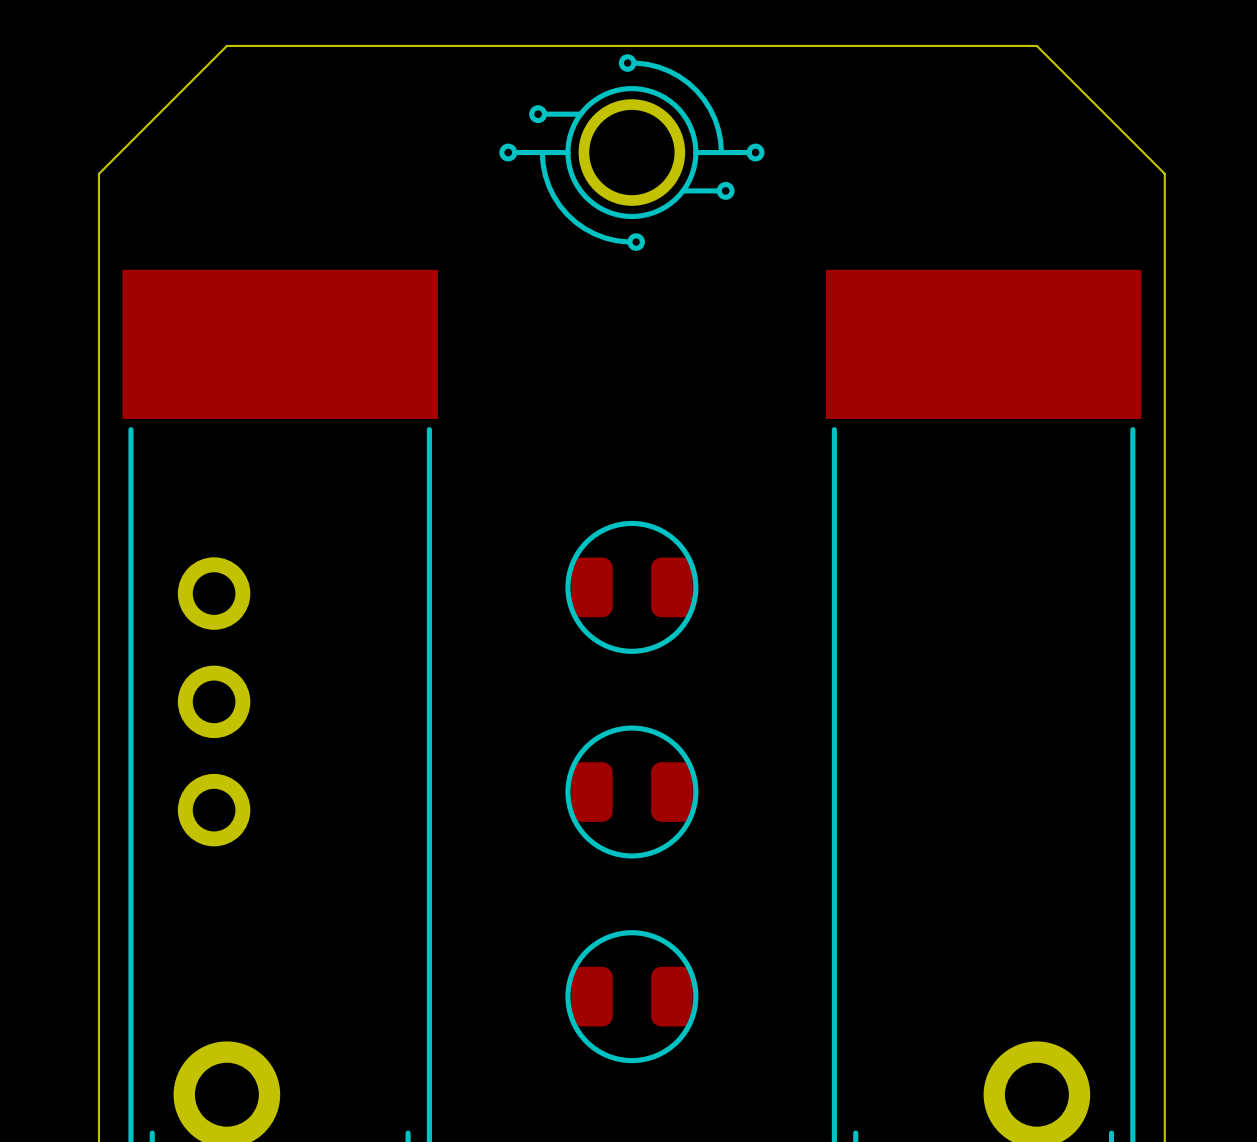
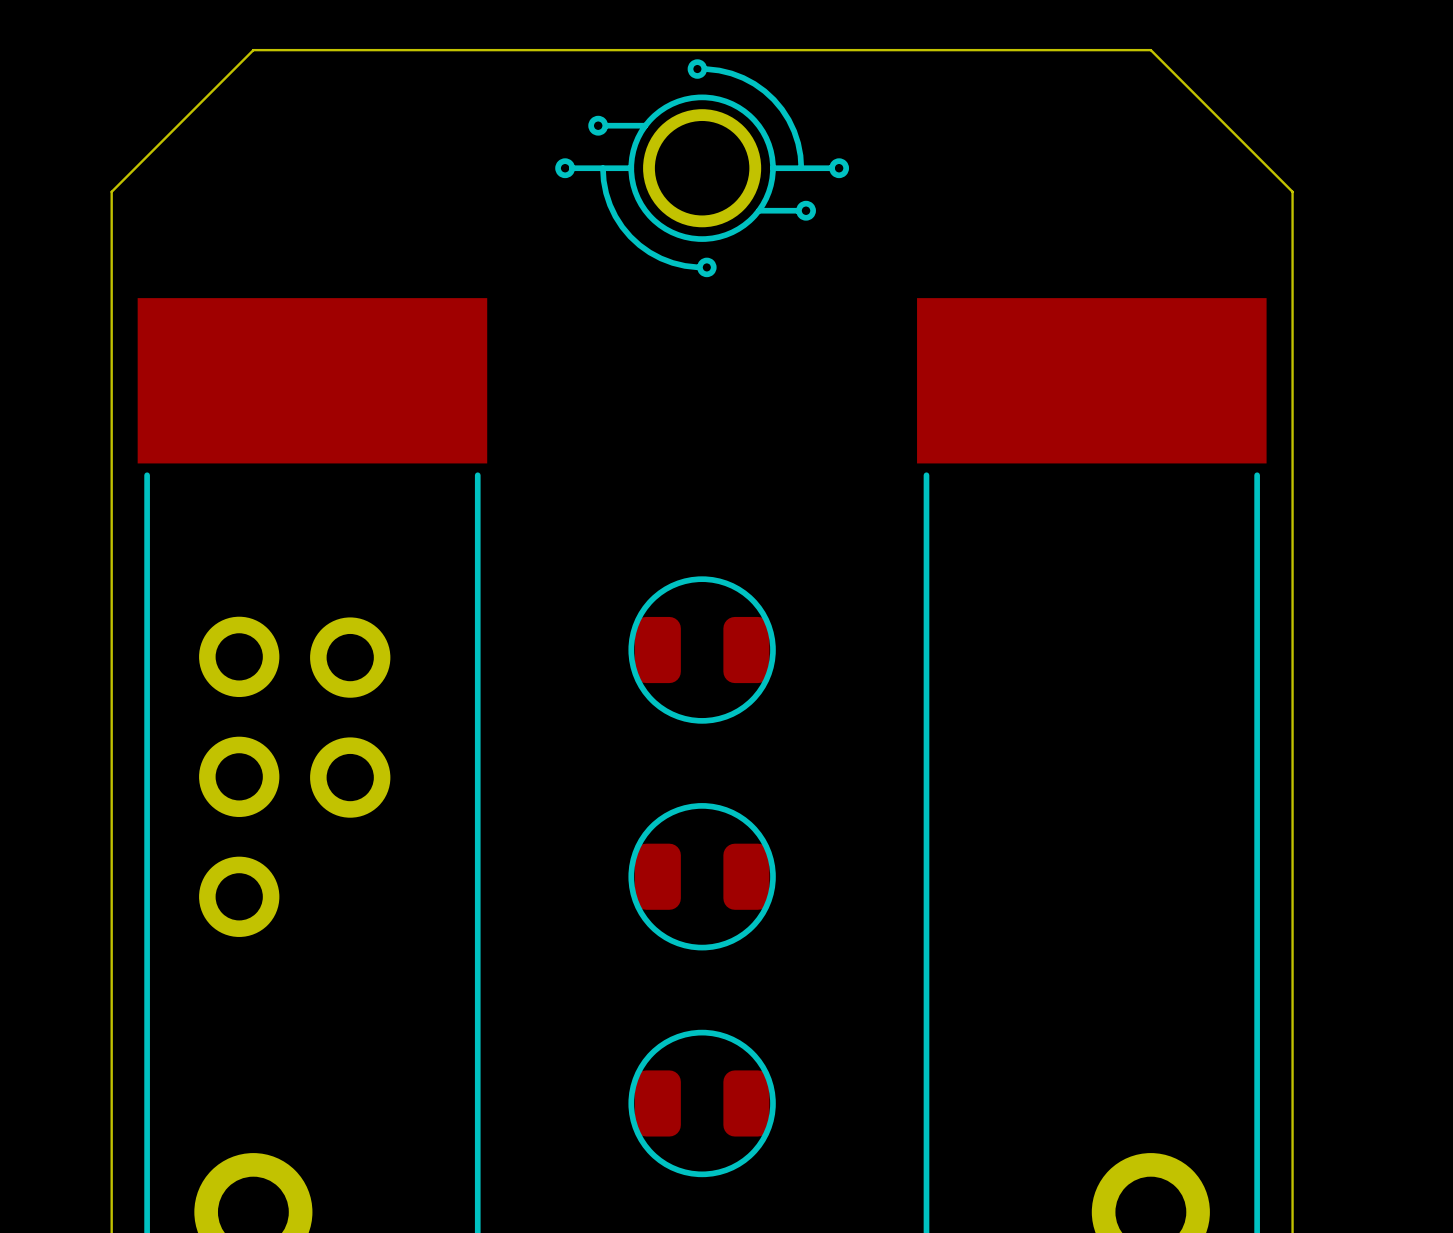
part: none -> (350, 717)

